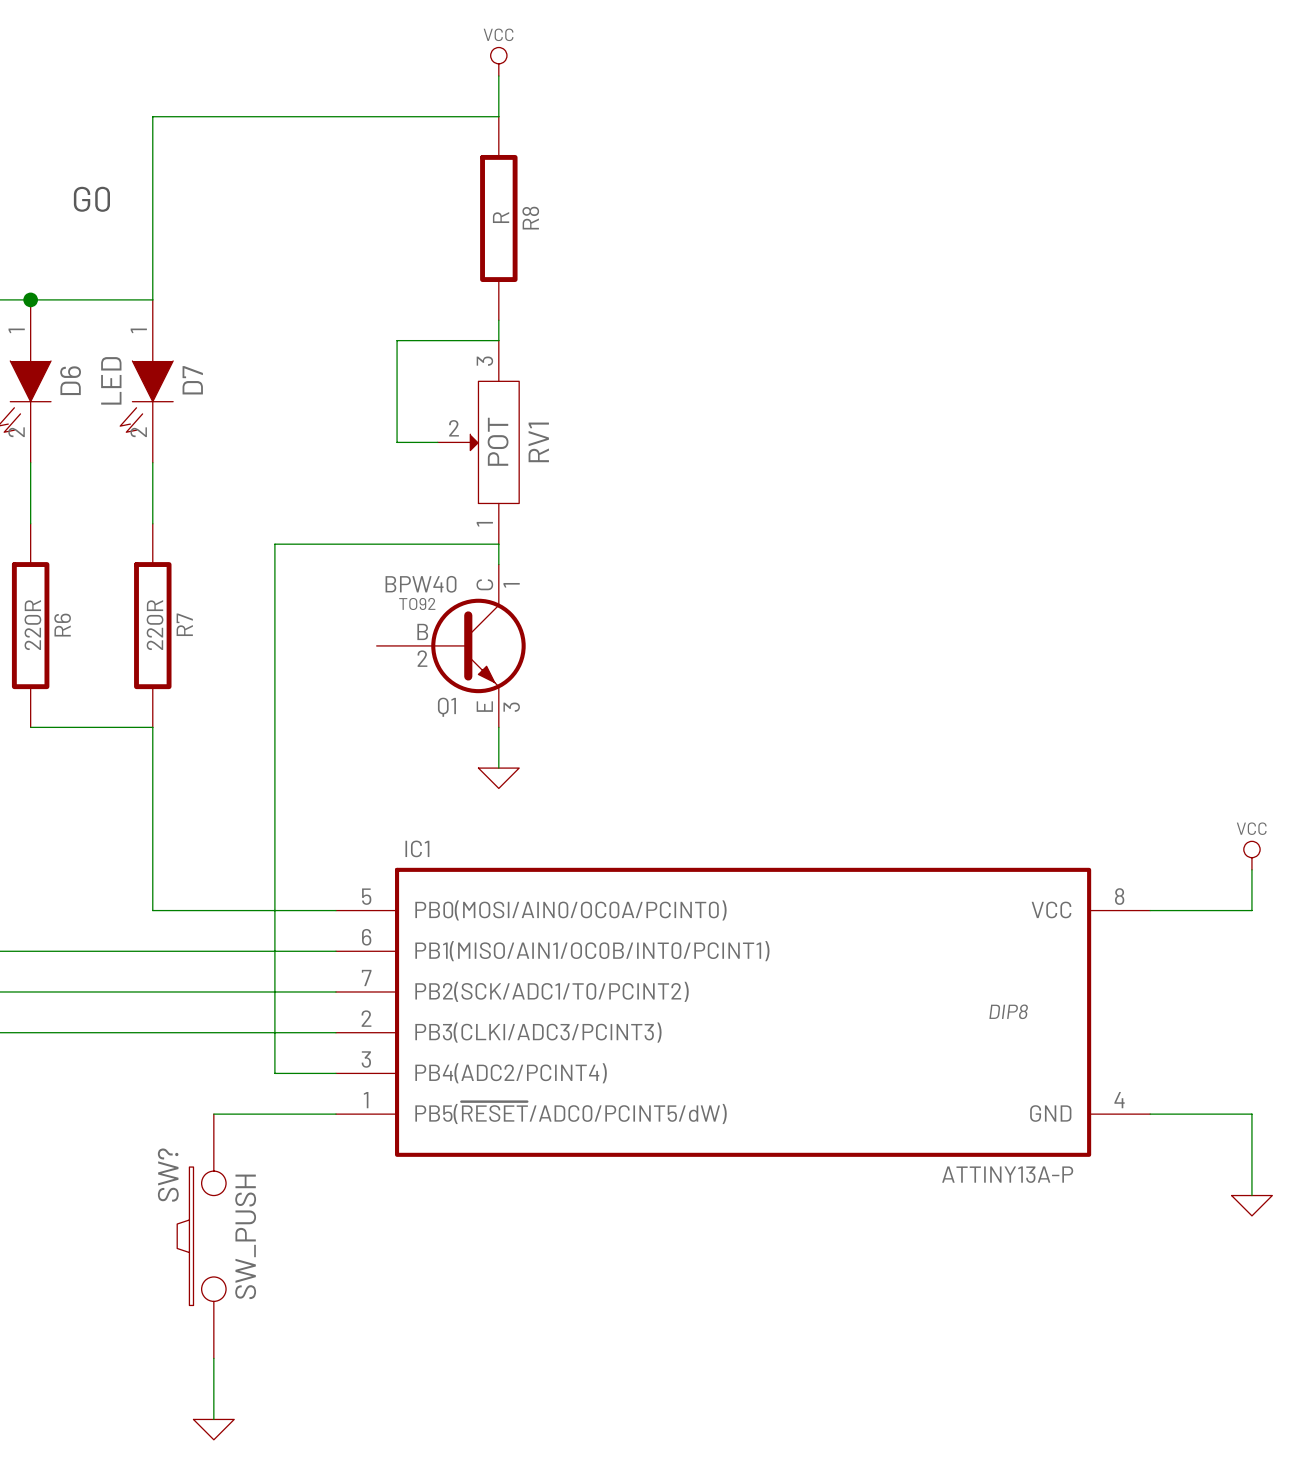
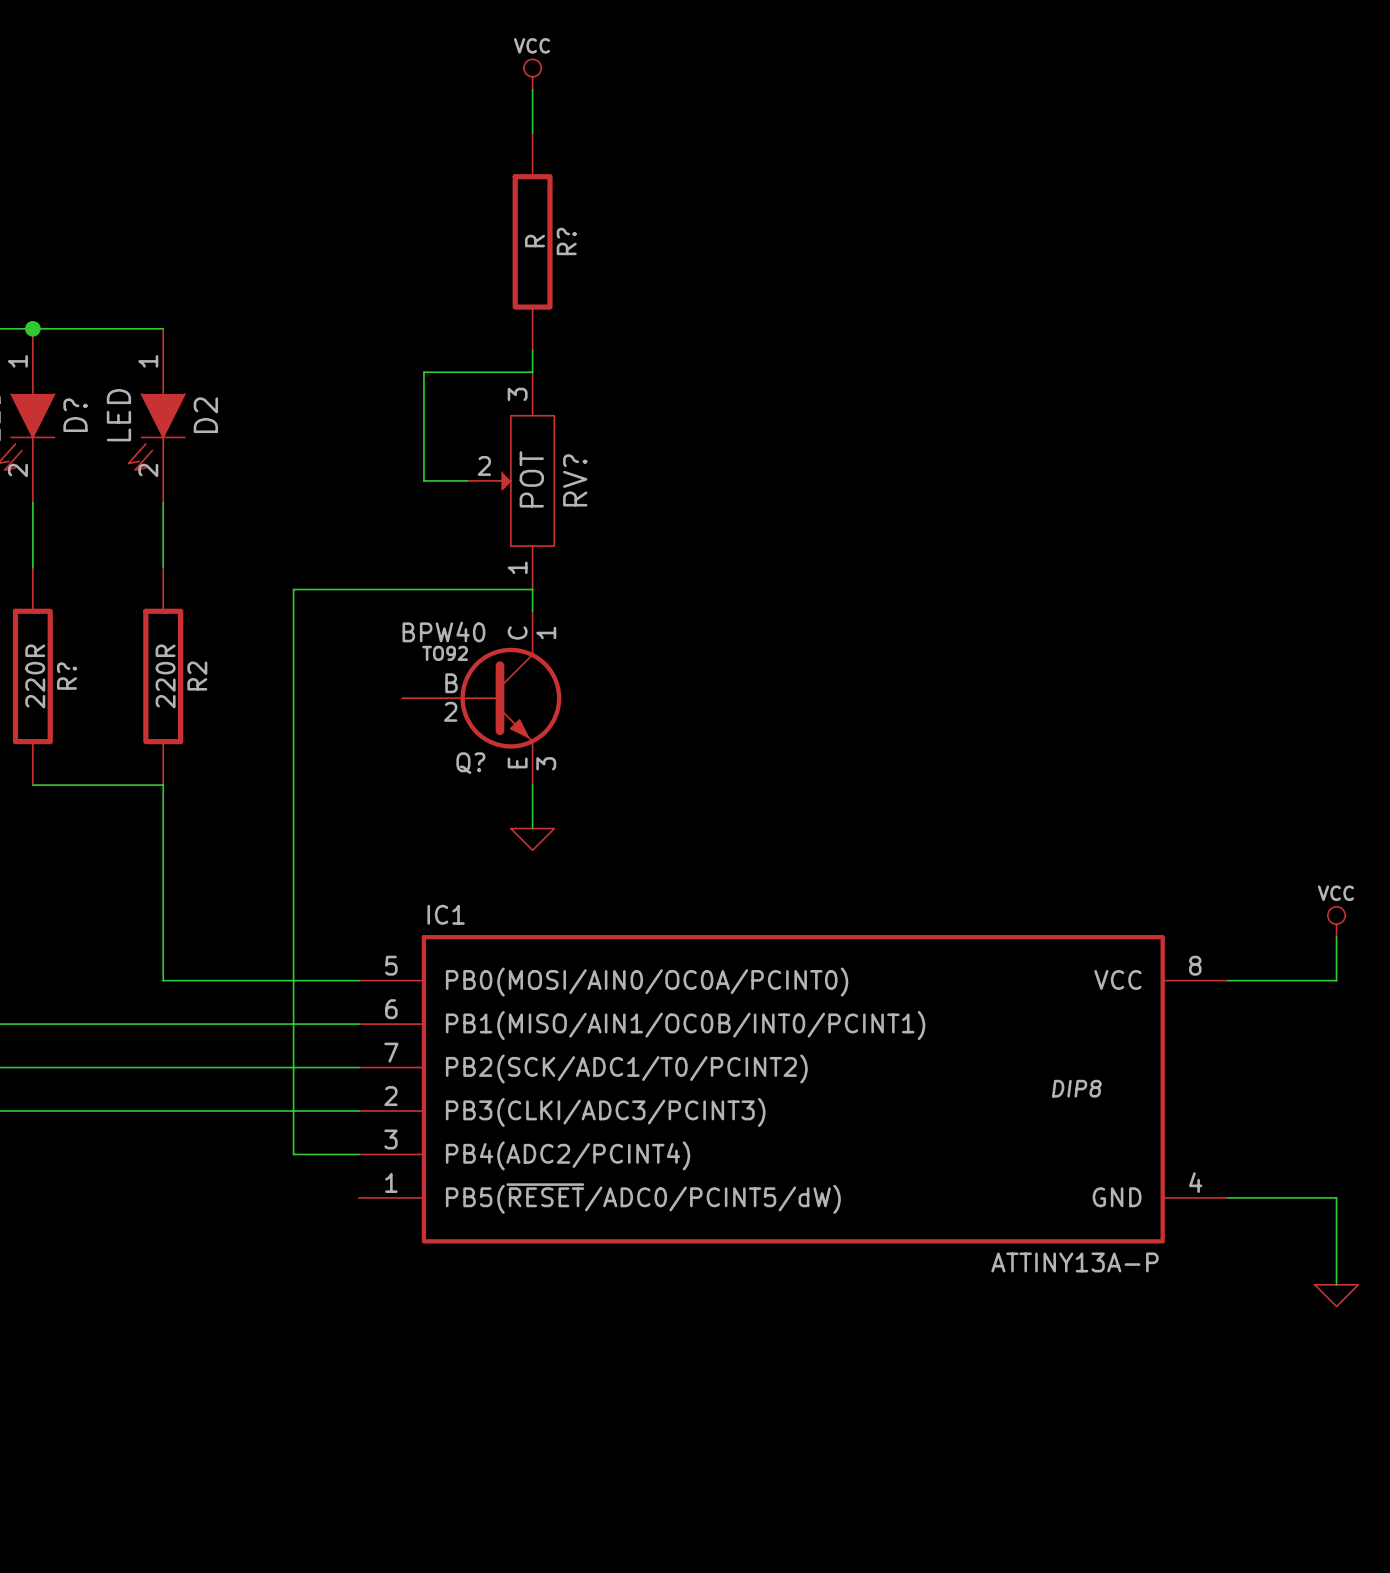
wire: (498, 116) (152, 116) (152, 299) -> none
text: G0 (91, 199) -> none
R8 name: R8 (530, 218) -> R? (566, 241)
D6 name: D6 (70, 380) -> D? (75, 415)
D7 name: D7 (192, 380) -> D2 (205, 415)
RV1 name: RV1 (538, 442) -> RV? (575, 480)
R7 name: R7 (184, 624) -> R2 (197, 676)
R6 name: R6 (62, 625) -> R? (66, 676)
Q1 name: Q1 (446, 707) -> Q? (470, 763)
wire: (213, 1114) (335, 1114) -> none
SW?: SW_PUSH (201, 1236) -> none
wire: (213, 1358) (213, 1419) -> none
power symbol: (213, 1429) -> none

